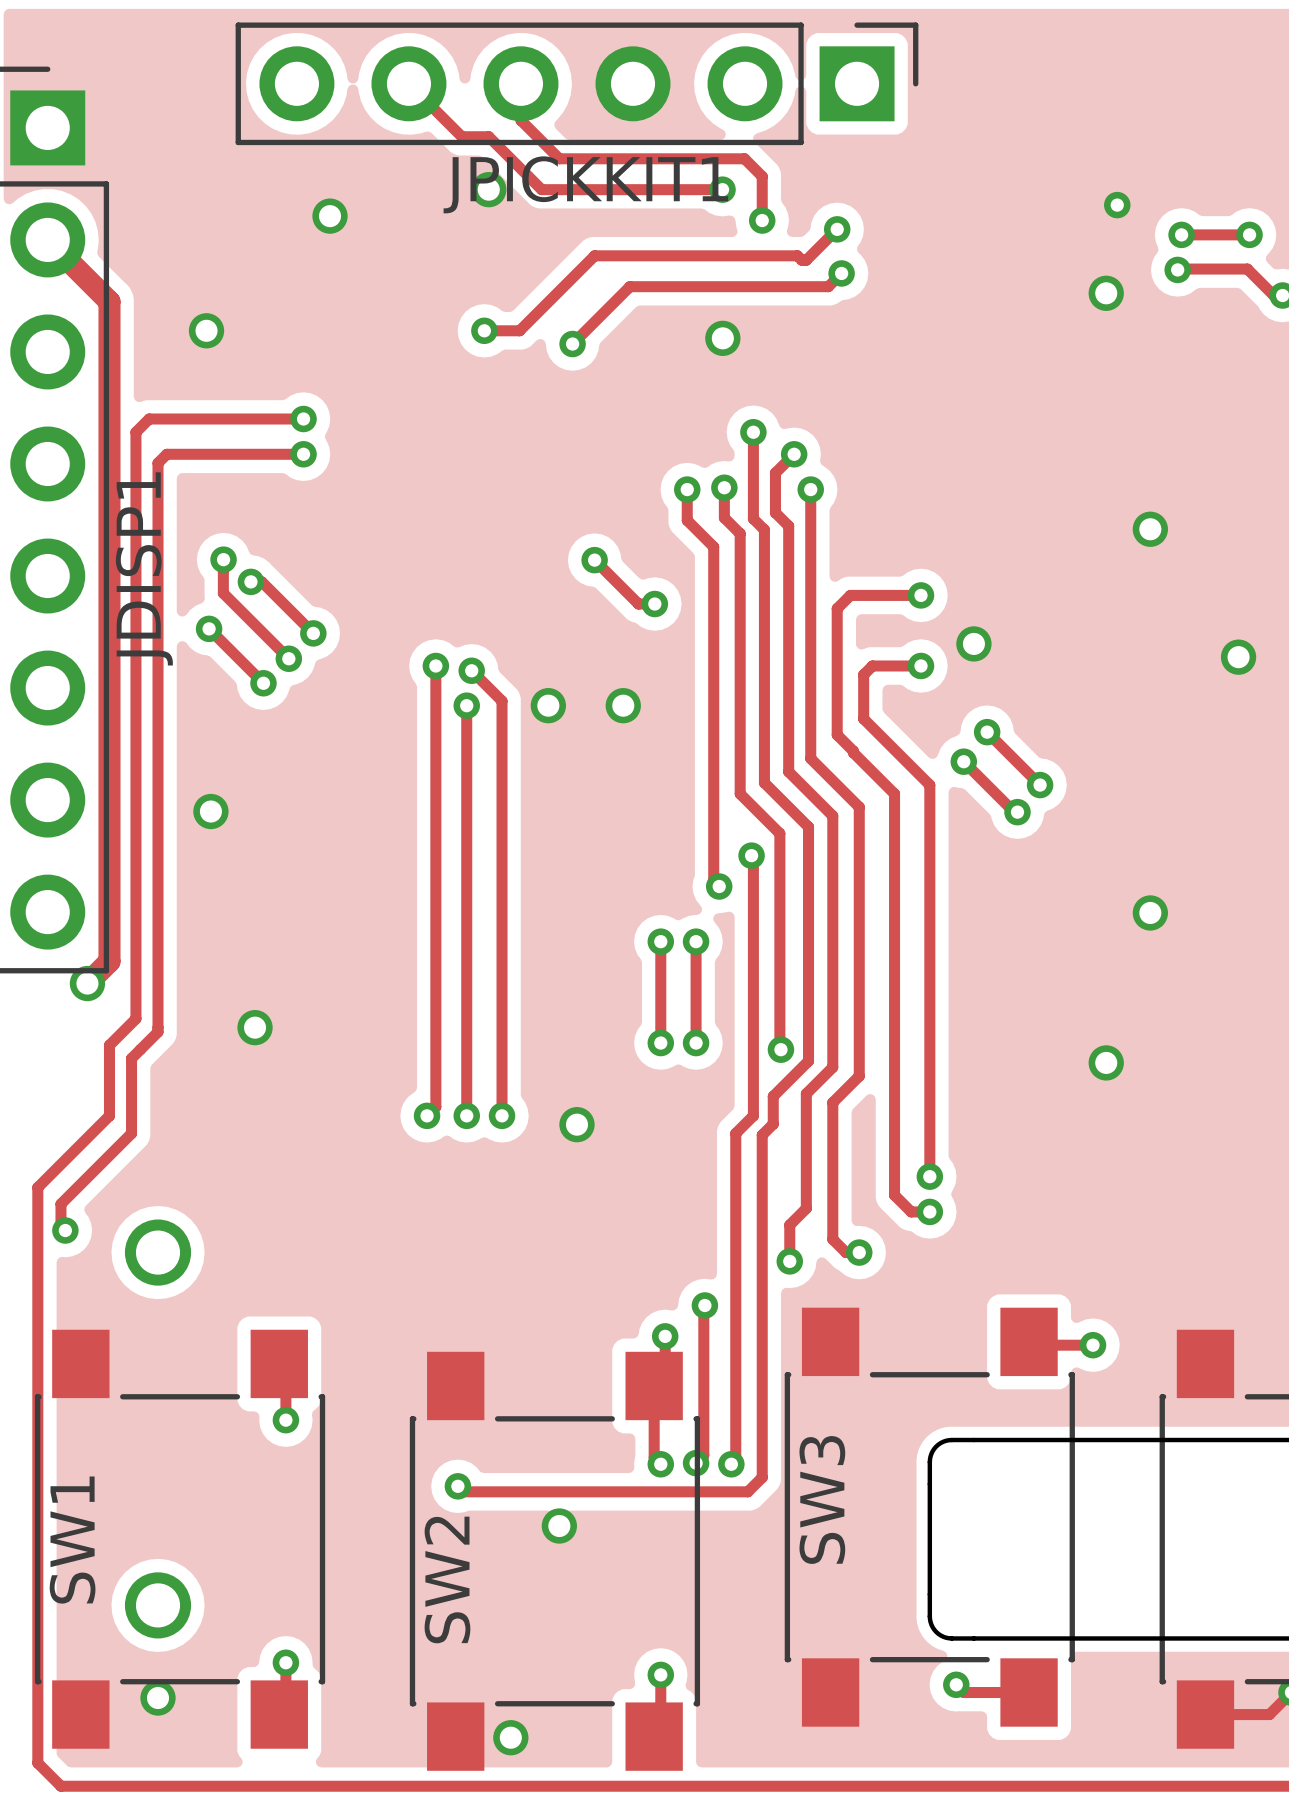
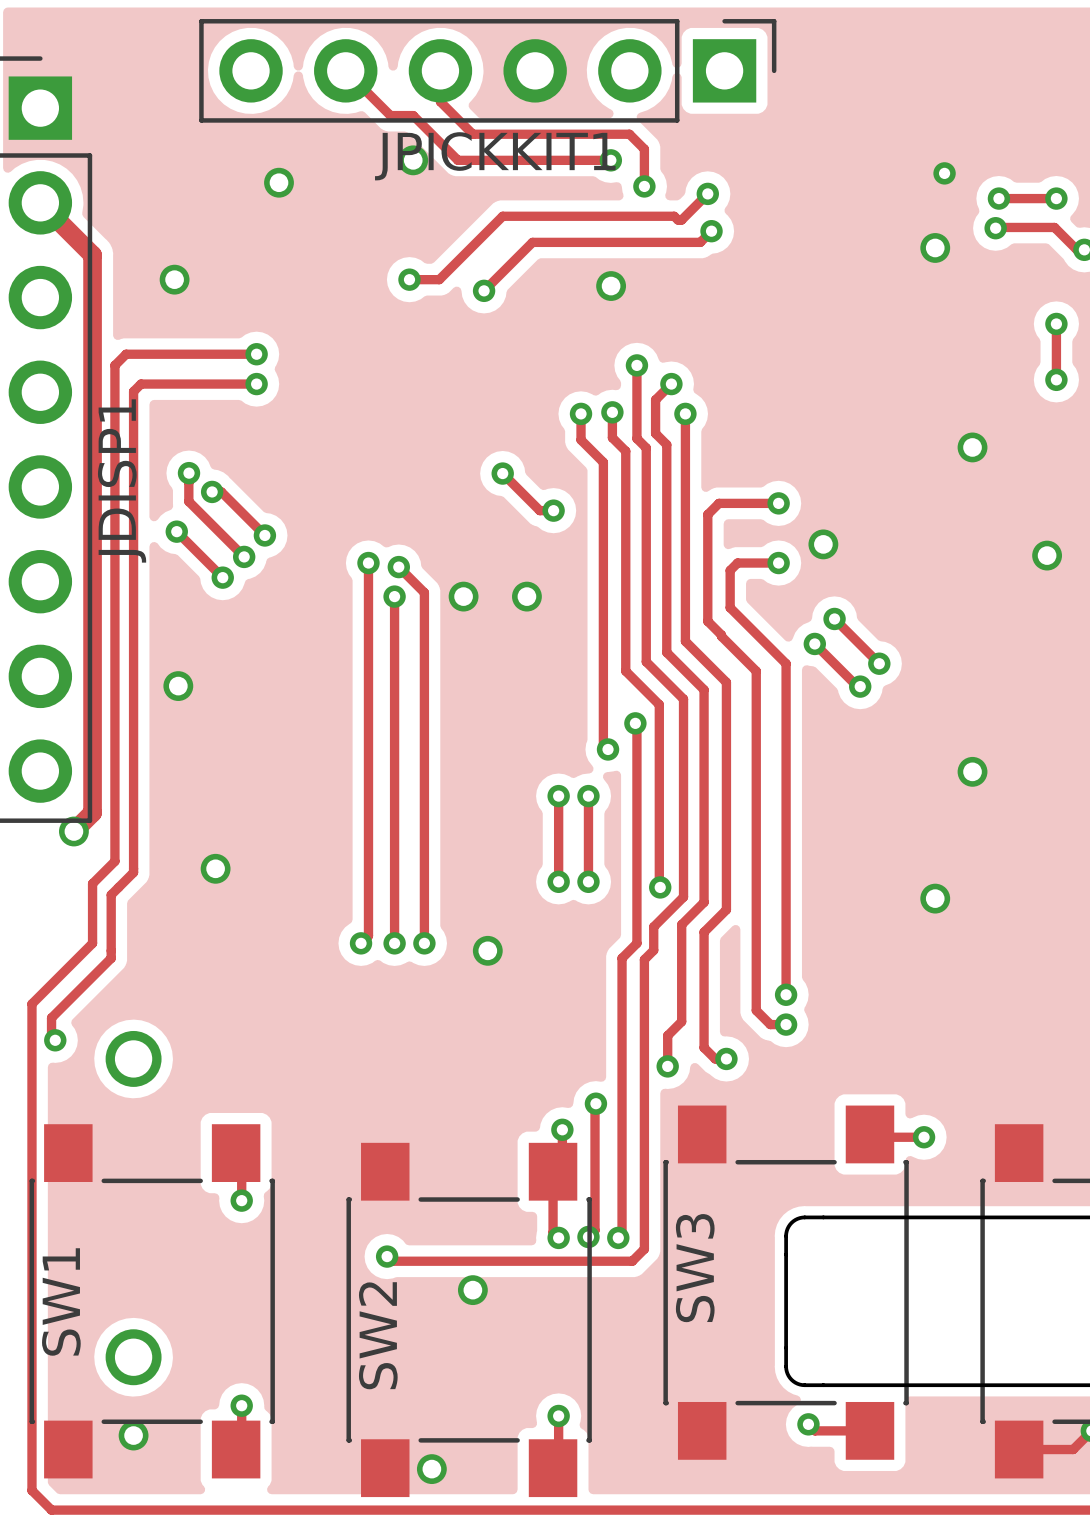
track: none -> (1056, 323) (1056, 379)
via: none -> (1056, 323)
via: none -> (1056, 379)

